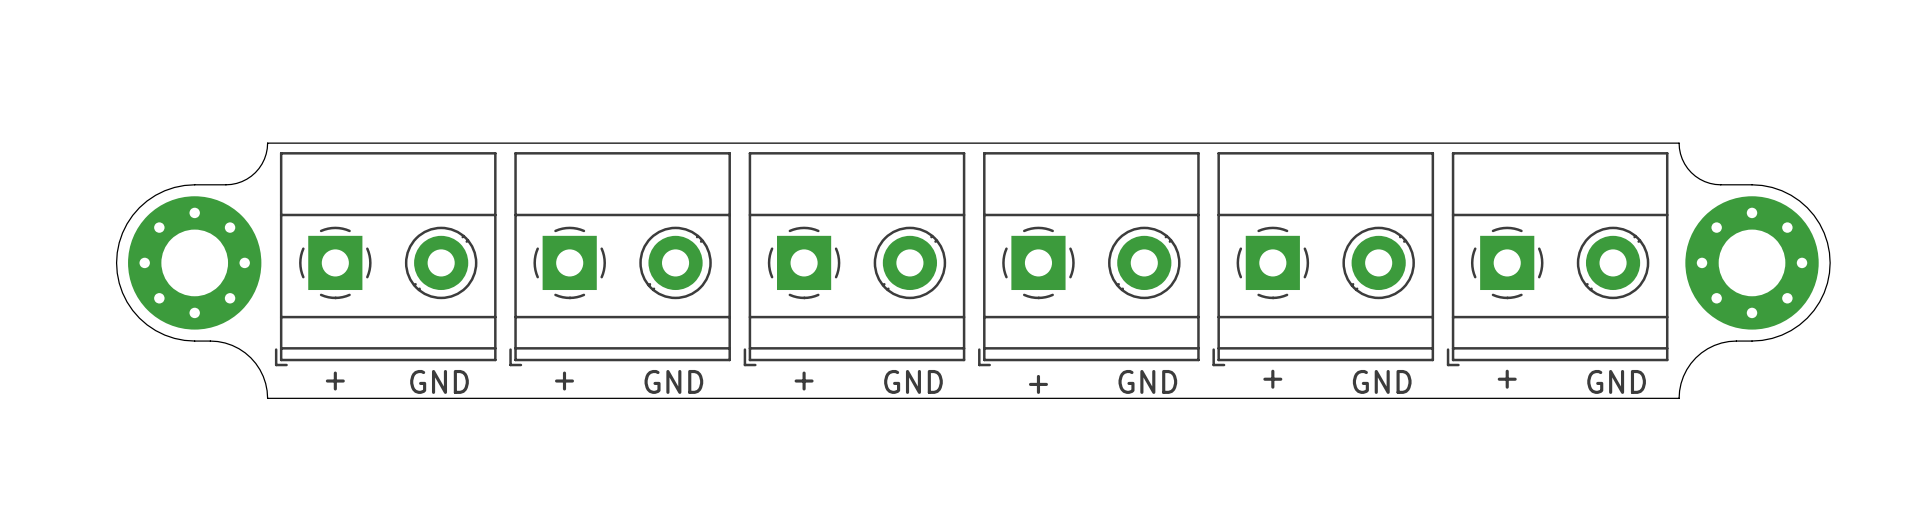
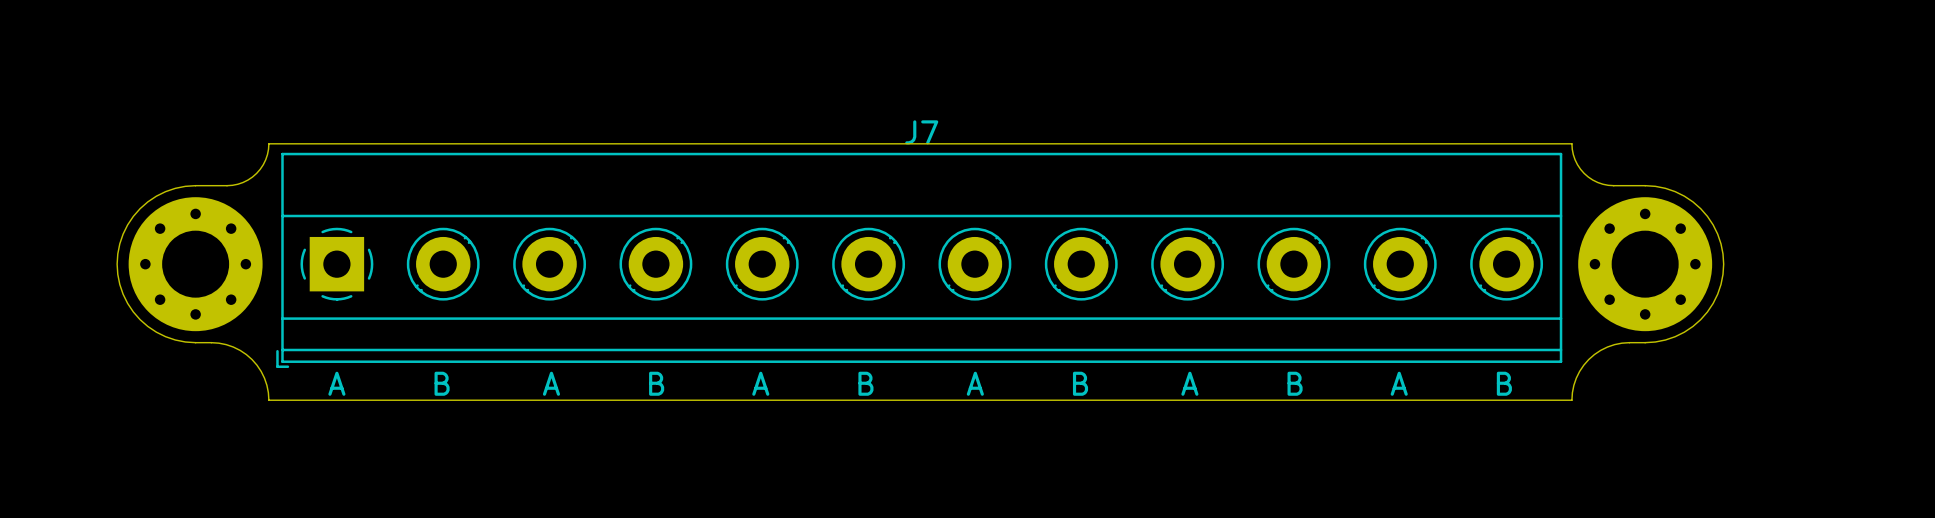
board edge: (1564, 143) (1679, 143) (1682, 159) (1687, 168) (1704, 181) (1715, 184) (1752, 184) (1772, 187) (1799, 200) (1819, 223) (1827, 242) (1830, 262) (1824, 292) (1807, 318) (1791, 330) (1772, 338) (1728, 341) (1707, 348) (1695, 357) (1686, 369) (1681, 383) (1679, 398) (1564, 398) -> (1571, 143) (1575, 159) (1580, 169) (1597, 182) (1608, 185) (1645, 185) (1665, 188) (1692, 201) (1713, 224) (1720, 243) (1723, 264) (1717, 294) (1700, 319) (1684, 332) (1665, 339) (1621, 343) (1600, 350) (1588, 359) (1579, 371) (1573, 385) (1571, 400)
part: (385, 259) -> none
part: (620, 259) -> none
part: (854, 259) -> none
J7: none -> (919, 260)
part: (1088, 259) -> none
part: (1323, 259) -> none
part: (1557, 259) -> none
part position: (1752, 262) -> (1645, 264)
text: + (1272, 379) -> B (1295, 383)
text: + (1507, 379) -> B (1504, 383)
text: + (335, 381) -> A (336, 383)
text: GND (439, 381) -> B (442, 383)
text: + (564, 381) -> A (551, 383)
text: GND (673, 381) -> B (656, 383)
text: none -> A (760, 383)
text: + (804, 381) -> none
text: none -> B (865, 383)
text: GND (913, 381) -> none
text: none -> A (975, 383)
text: none -> B (1080, 383)
text: GND (1147, 381) -> none
text: none -> A (1189, 383)
text: GND (1382, 381) -> A (1399, 383)
text: GND (1616, 381) -> none
text: + (1038, 384) -> none

